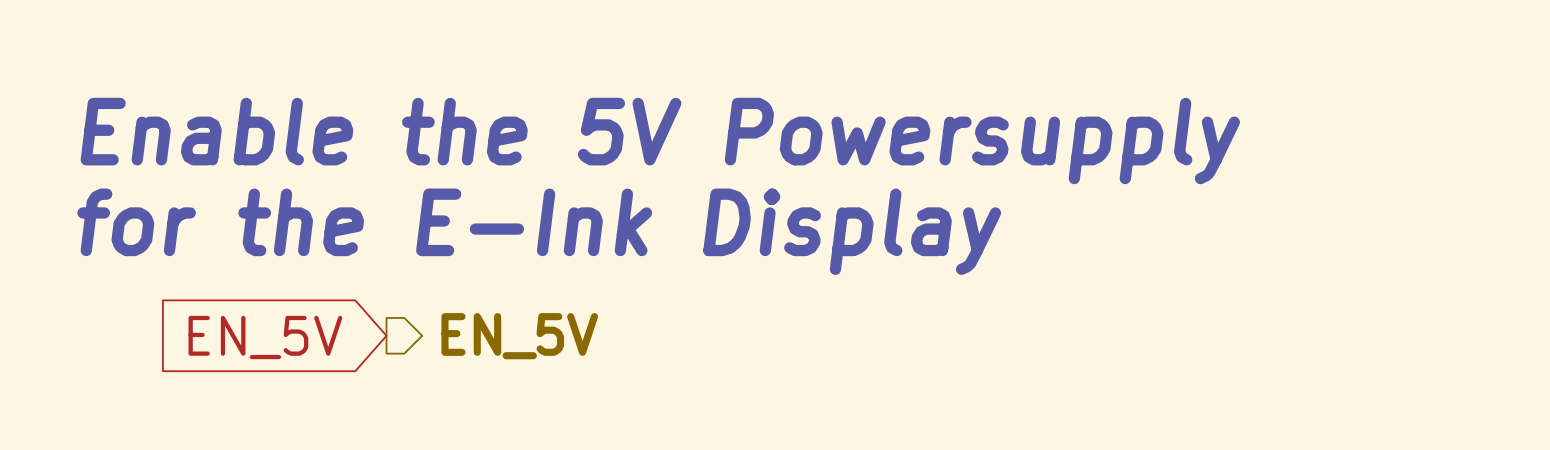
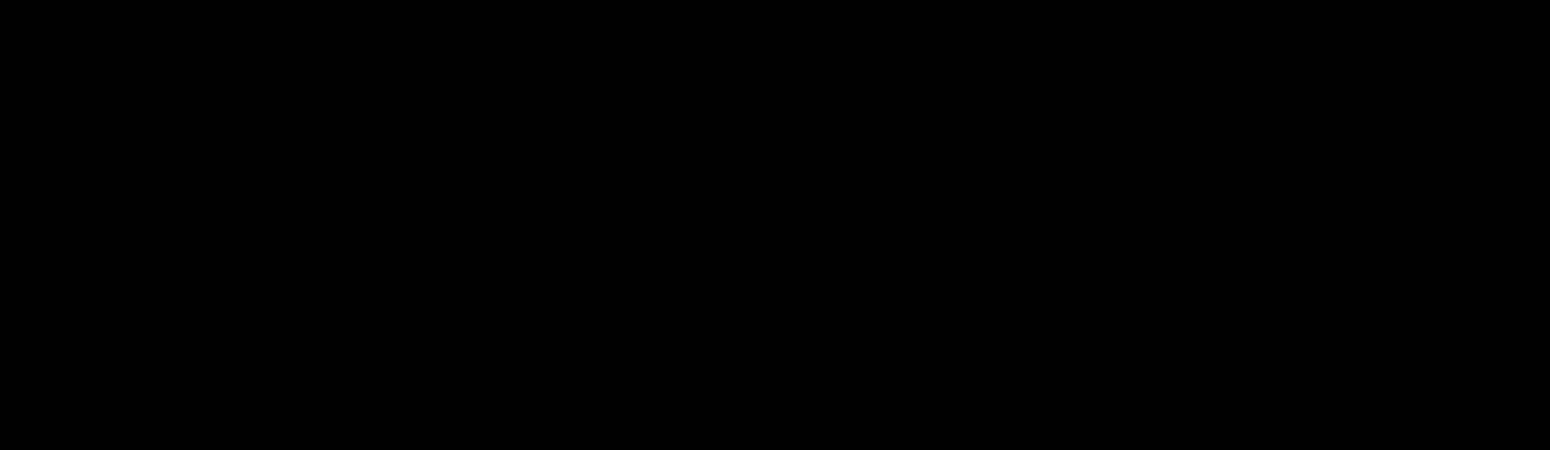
text: Enable the 5V Powersupply (660, 141) -> none
text: for the E-Ink Display (539, 231) -> none
hierarchical label: EN_5V (519, 336) -> none
global label: EN_5V (265, 337) -> none

